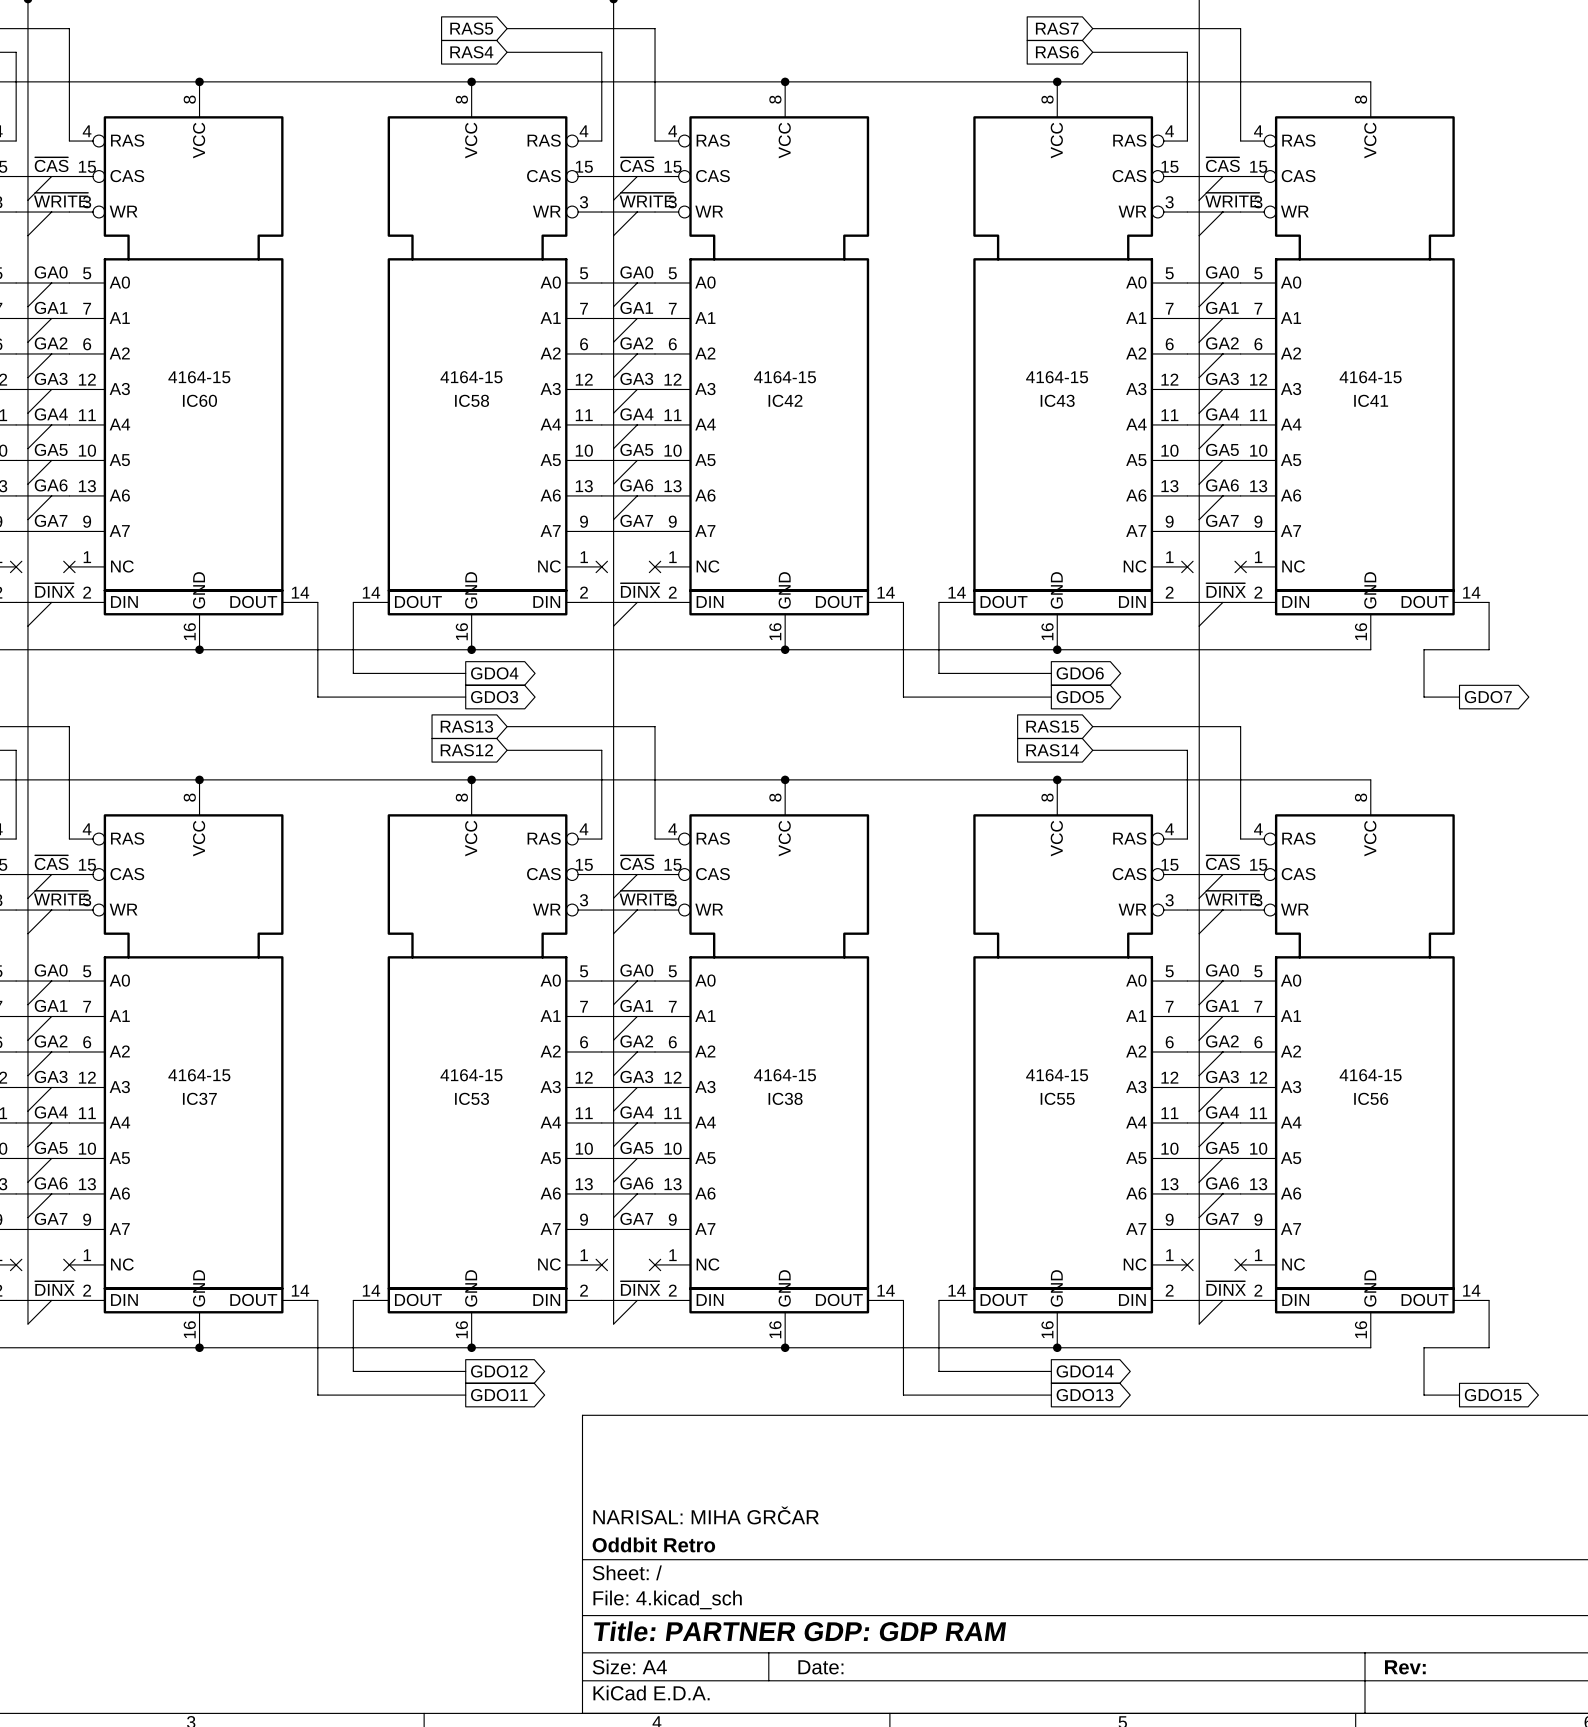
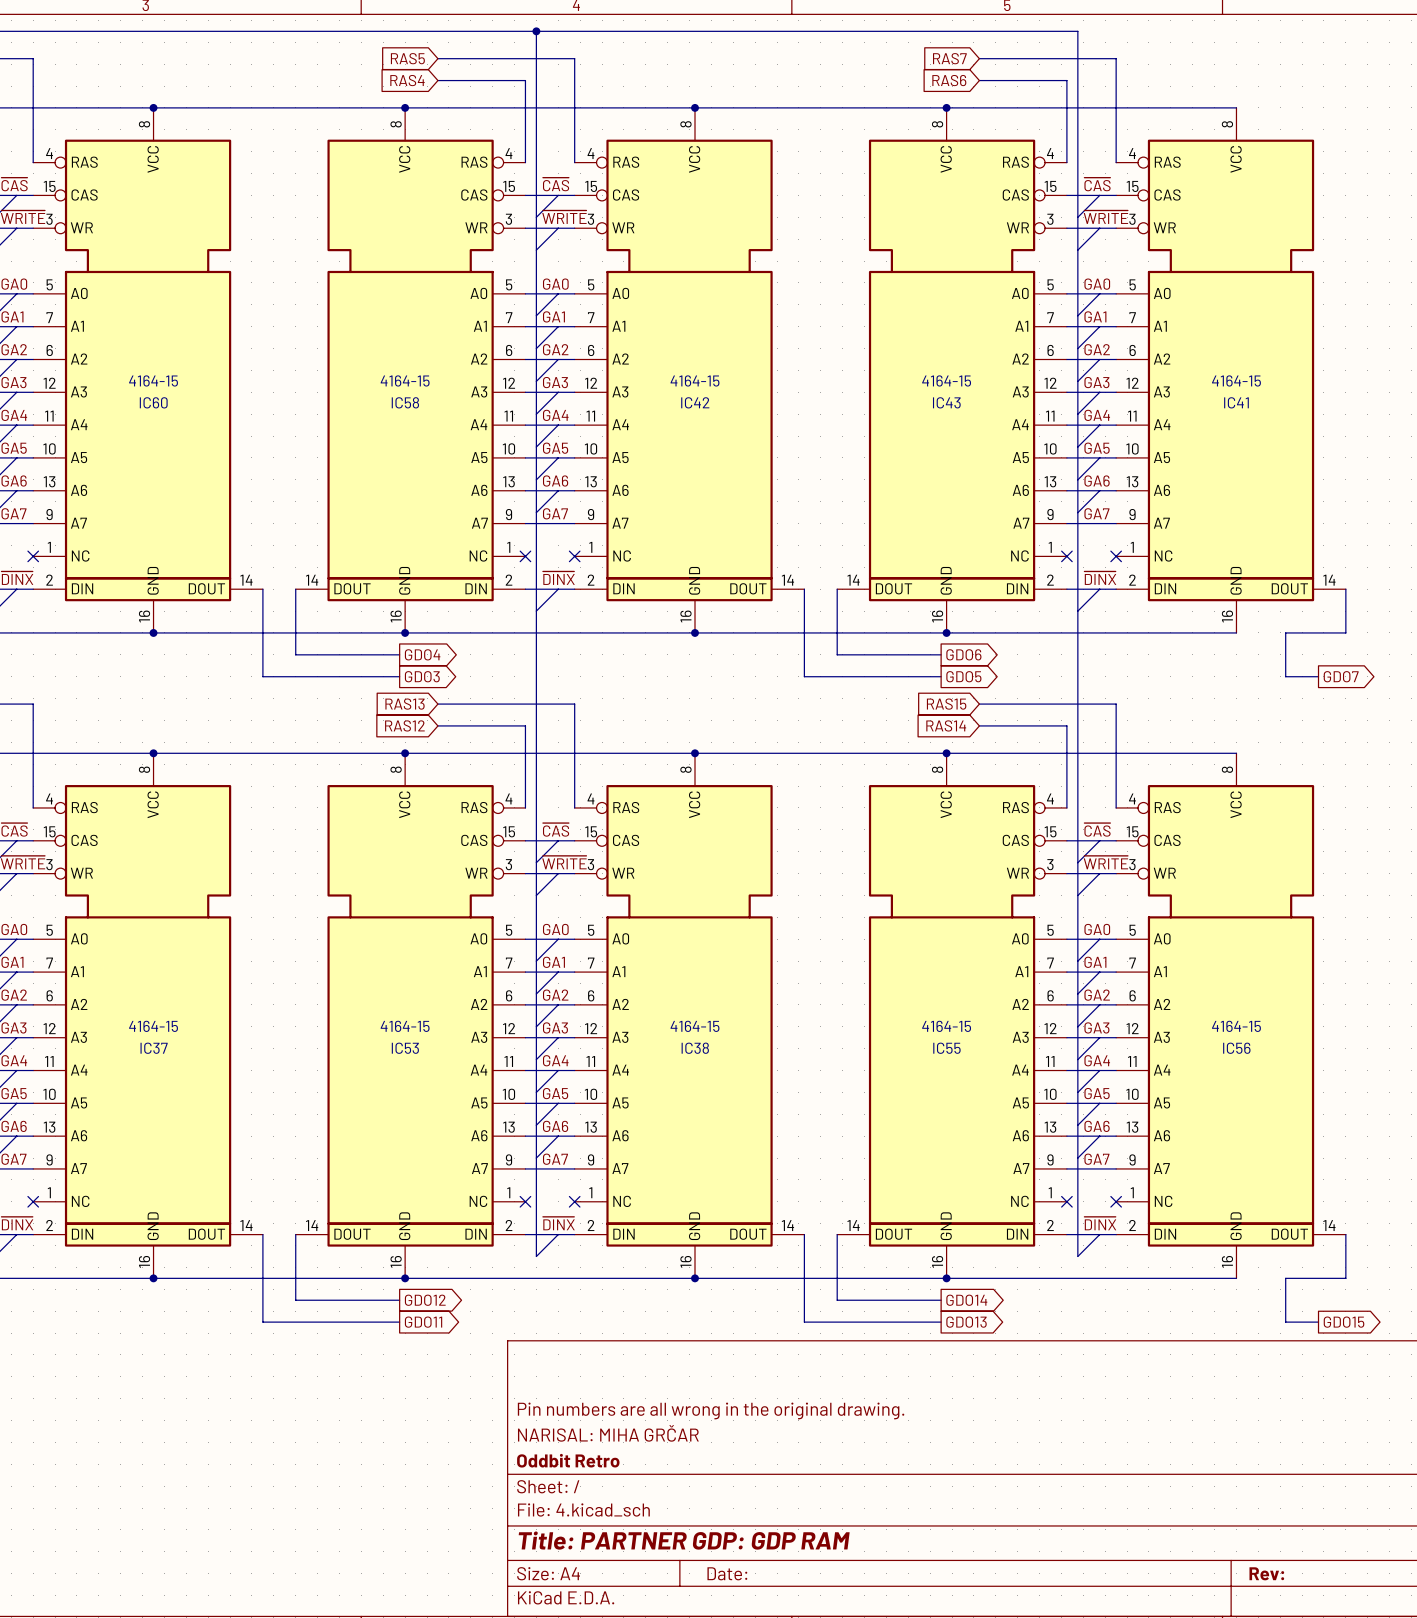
title block: none -> Pin numbers are all wrong in the original drawing. (711, 1410)

